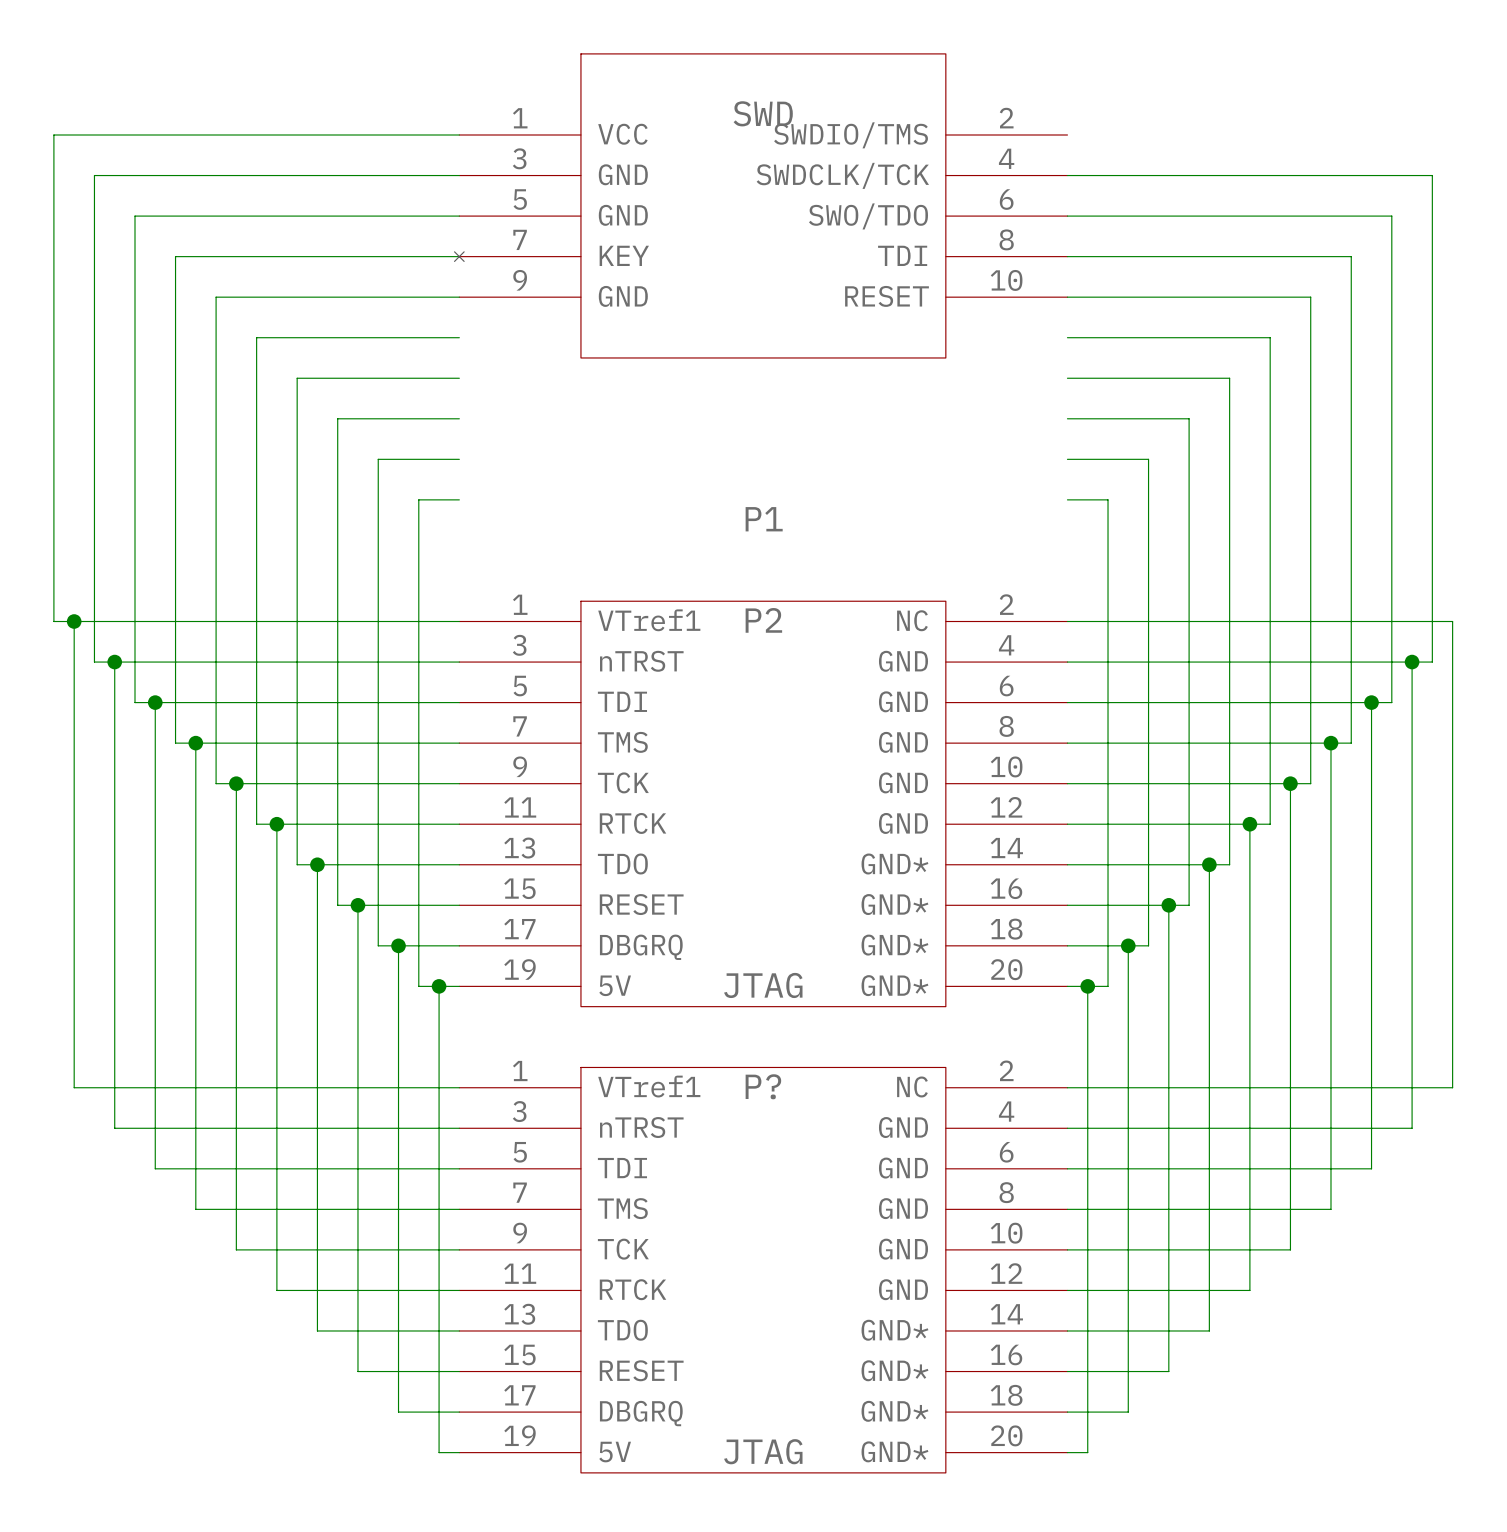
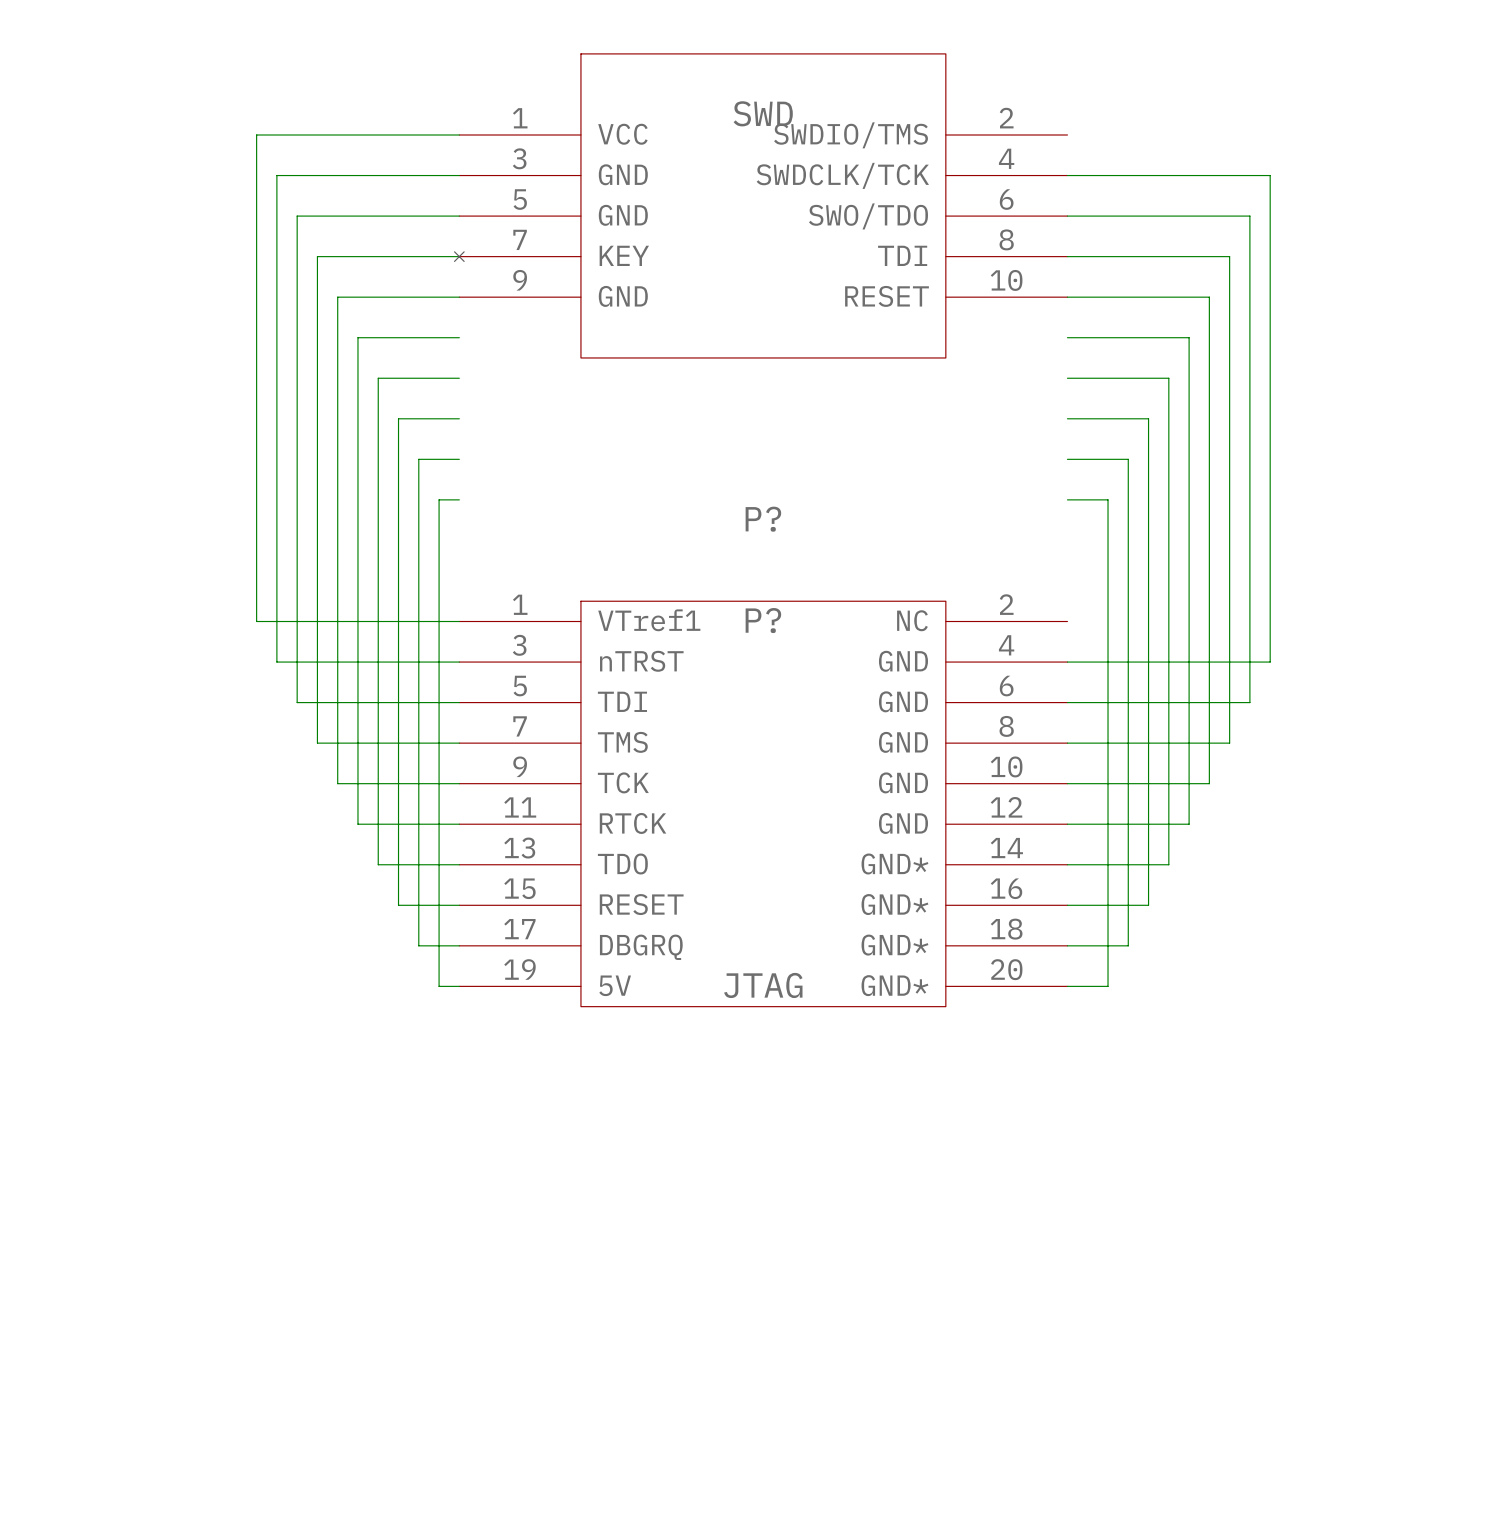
wire: (256, 134) (53, 134) (53, 621) (256, 621) (256, 824) (357, 824) -> (357, 337) (357, 824)
wire: (276, 175) (94, 175) (94, 662) (276, 662) -> (276, 175) (276, 662)
wire: (1270, 175) (1432, 175) (1432, 662) (1270, 662) (1270, 824) (1189, 824) (1189, 905) (1148, 905) (1148, 945) (1128, 945) (1128, 1412) (1067, 1412) -> none
wire: (297, 216) (134, 216) (134, 702) (297, 702) (297, 864) (378, 864) (378, 945) (418, 945) (418, 986) (439, 986) (439, 1452) (459, 1452) -> none
wire: (1249, 216) (1391, 216) (1391, 702) (1249, 702) -> (1249, 216) (1249, 702)
wire: (317, 256) (175, 256) (175, 743) (317, 743) -> (317, 256) (317, 743)
wire: (1229, 256) (1351, 256) (1351, 743) (1229, 743) (1229, 864) (1168, 864) -> (1168, 378) (1168, 864)
wire: (337, 297) (216, 297) (216, 783) (337, 783) (337, 905) (398, 905) -> (398, 418) (398, 905)
wire: (1209, 297) (1310, 297) (1310, 783) (1209, 783) -> (1209, 297) (1209, 783)
wire: (256, 337) (357, 337) -> (256, 337) (256, 134)
wire: (1189, 337) (1270, 337) -> (1270, 175) (1270, 337)
wire: (297, 378) (378, 378) -> (297, 378) (297, 216)
wire: (1168, 378) (1229, 378) -> (1229, 256) (1229, 378)
wire: (337, 418) (398, 418) -> (337, 418) (337, 297)
wire: (1148, 418) (1189, 418) -> (1189, 337) (1189, 418)
wire: (378, 459) (418, 459) -> (378, 459) (378, 378)
wire: (1128, 459) (1148, 459) -> (1148, 418) (1148, 459)
wire: none -> (1128, 459) (1128, 945)
wire: (418, 499) (439, 499) -> (418, 499) (418, 459)
wire: none -> (439, 499) (439, 986)
P1 name: P1 (764, 519) -> P? (763, 519)
P2 name: P2 (763, 620) -> P? (763, 620)
wire: (74, 621) (74, 1087) (459, 1087) -> none
junction: (74, 621) -> none
wire: (1067, 621) (1452, 621) (1452, 1087) (1067, 1087) -> none
wire: (114, 662) (114, 1128) (459, 1128) -> none
junction: (114, 662) -> none
wire: (1412, 662) (1412, 1128) (1067, 1128) -> none
junction: (1412, 662) -> none
wire: (155, 702) (155, 1168) (459, 1168) -> none
junction: (155, 702) -> none
wire: (1371, 702) (1371, 1168) (1067, 1168) -> none
junction: (1371, 702) -> none
wire: (195, 743) (195, 1209) (459, 1209) -> none
junction: (195, 743) -> none
wire: (1330, 743) (1330, 1209) (1067, 1209) -> none
junction: (1330, 743) -> none
wire: (236, 783) (236, 1249) (459, 1249) -> none
junction: (236, 783) -> none
wire: (1290, 783) (1290, 1249) (1067, 1249) -> none
junction: (1290, 783) -> none
wire: (276, 824) (276, 1290) (459, 1290) -> none
junction: (276, 824) -> none
wire: (1249, 824) (1249, 1290) (1067, 1290) -> none
junction: (1249, 824) -> none
wire: (317, 864) (317, 1330) (459, 1330) -> none
junction: (317, 864) -> none
wire: (1209, 864) (1209, 1330) (1067, 1330) -> none
junction: (1209, 864) -> none
wire: (357, 905) (357, 1371) (459, 1371) -> none
junction: (357, 905) -> none
wire: (1168, 905) (1168, 1371) (1067, 1371) -> none
junction: (1168, 905) -> none
wire: (398, 945) (398, 1412) (459, 1412) -> none
junction: (398, 945) -> none
junction: (1128, 945) -> none
junction: (439, 986) -> none
wire: (1087, 986) (1087, 1452) (1067, 1452) -> none
junction: (1087, 986) -> none
P?: JTAG (763, 1270) -> none

